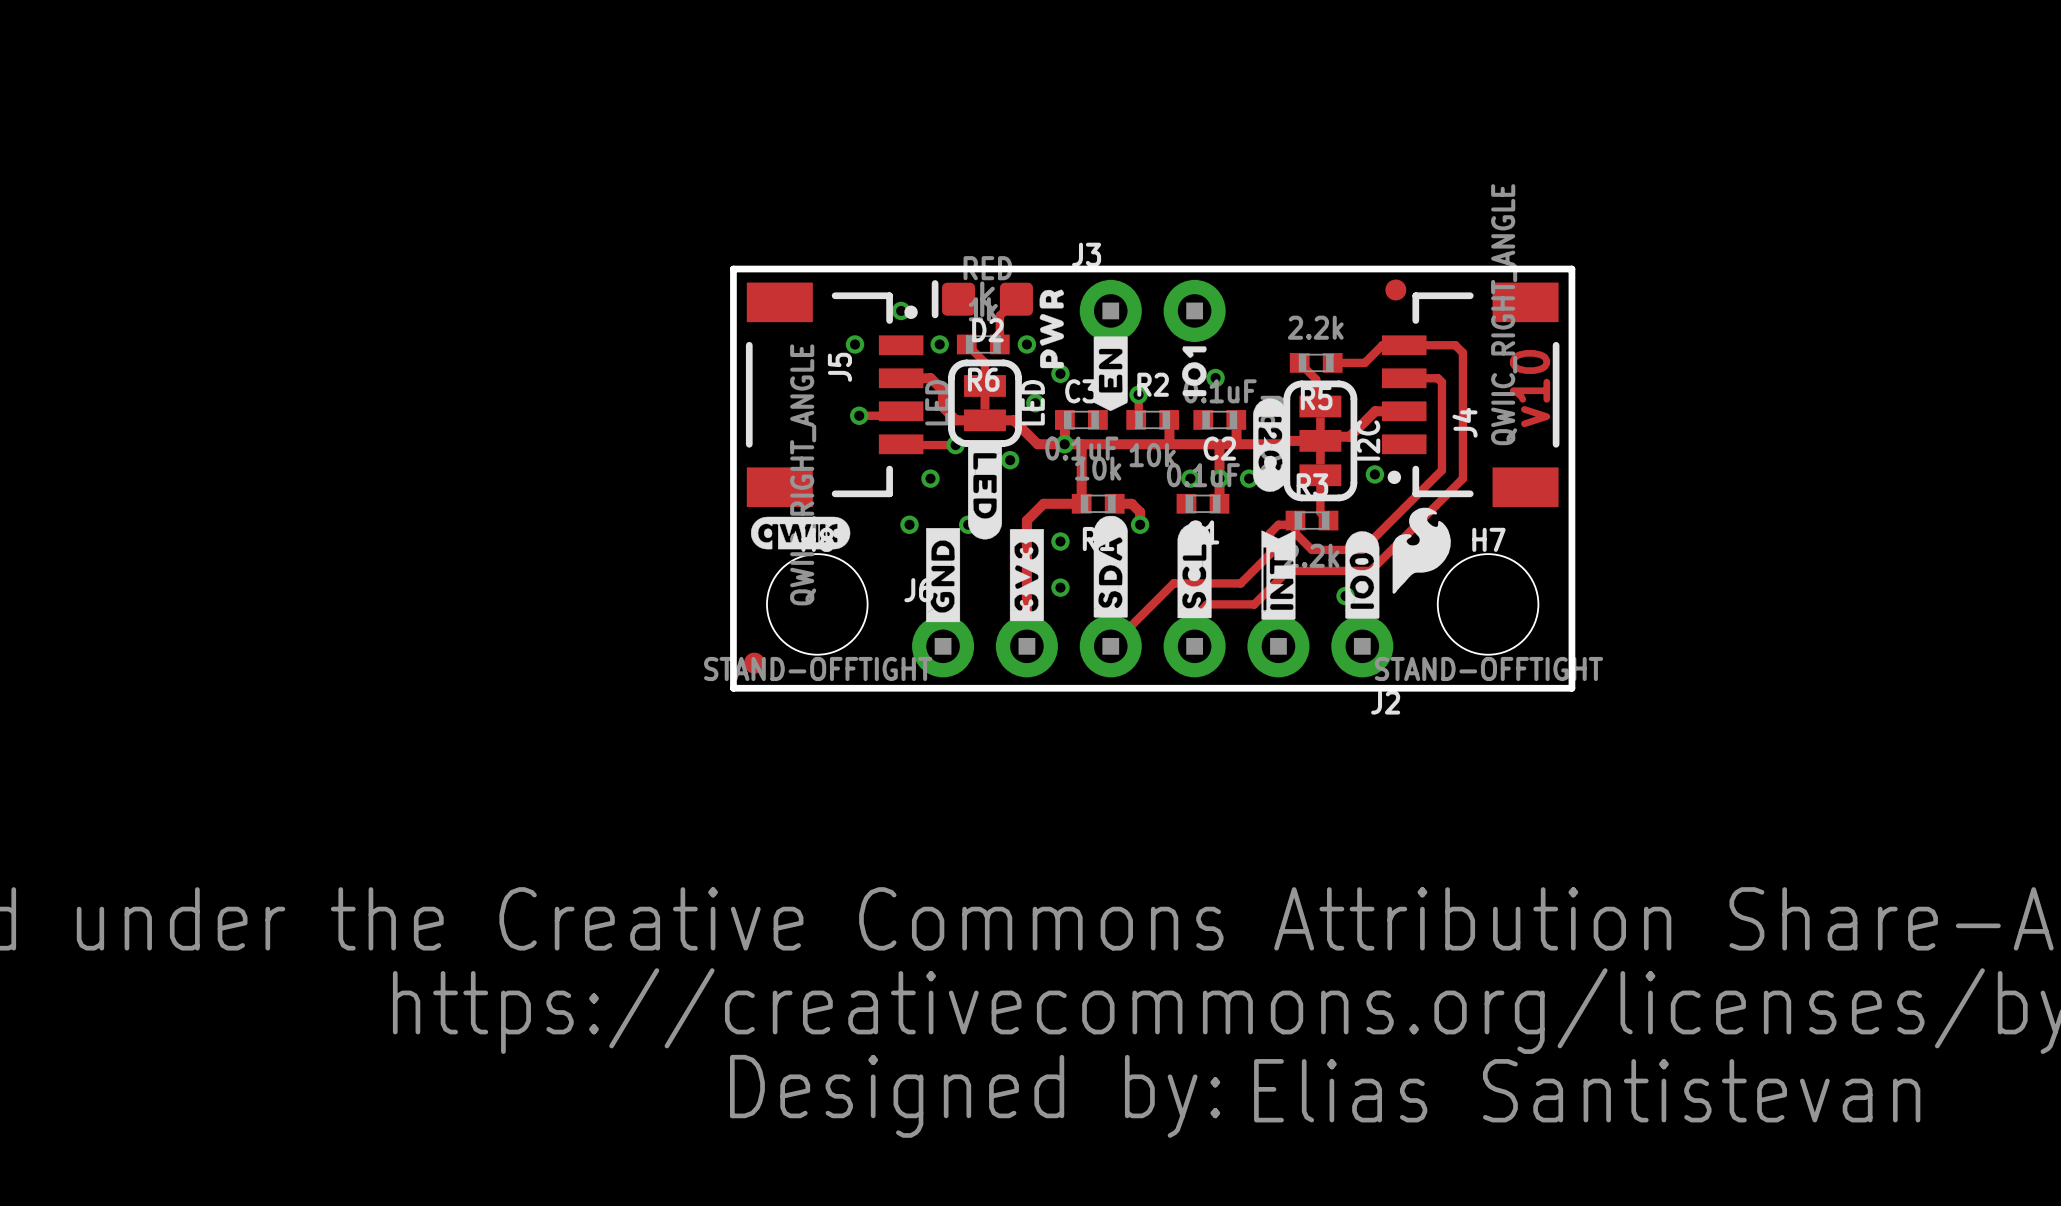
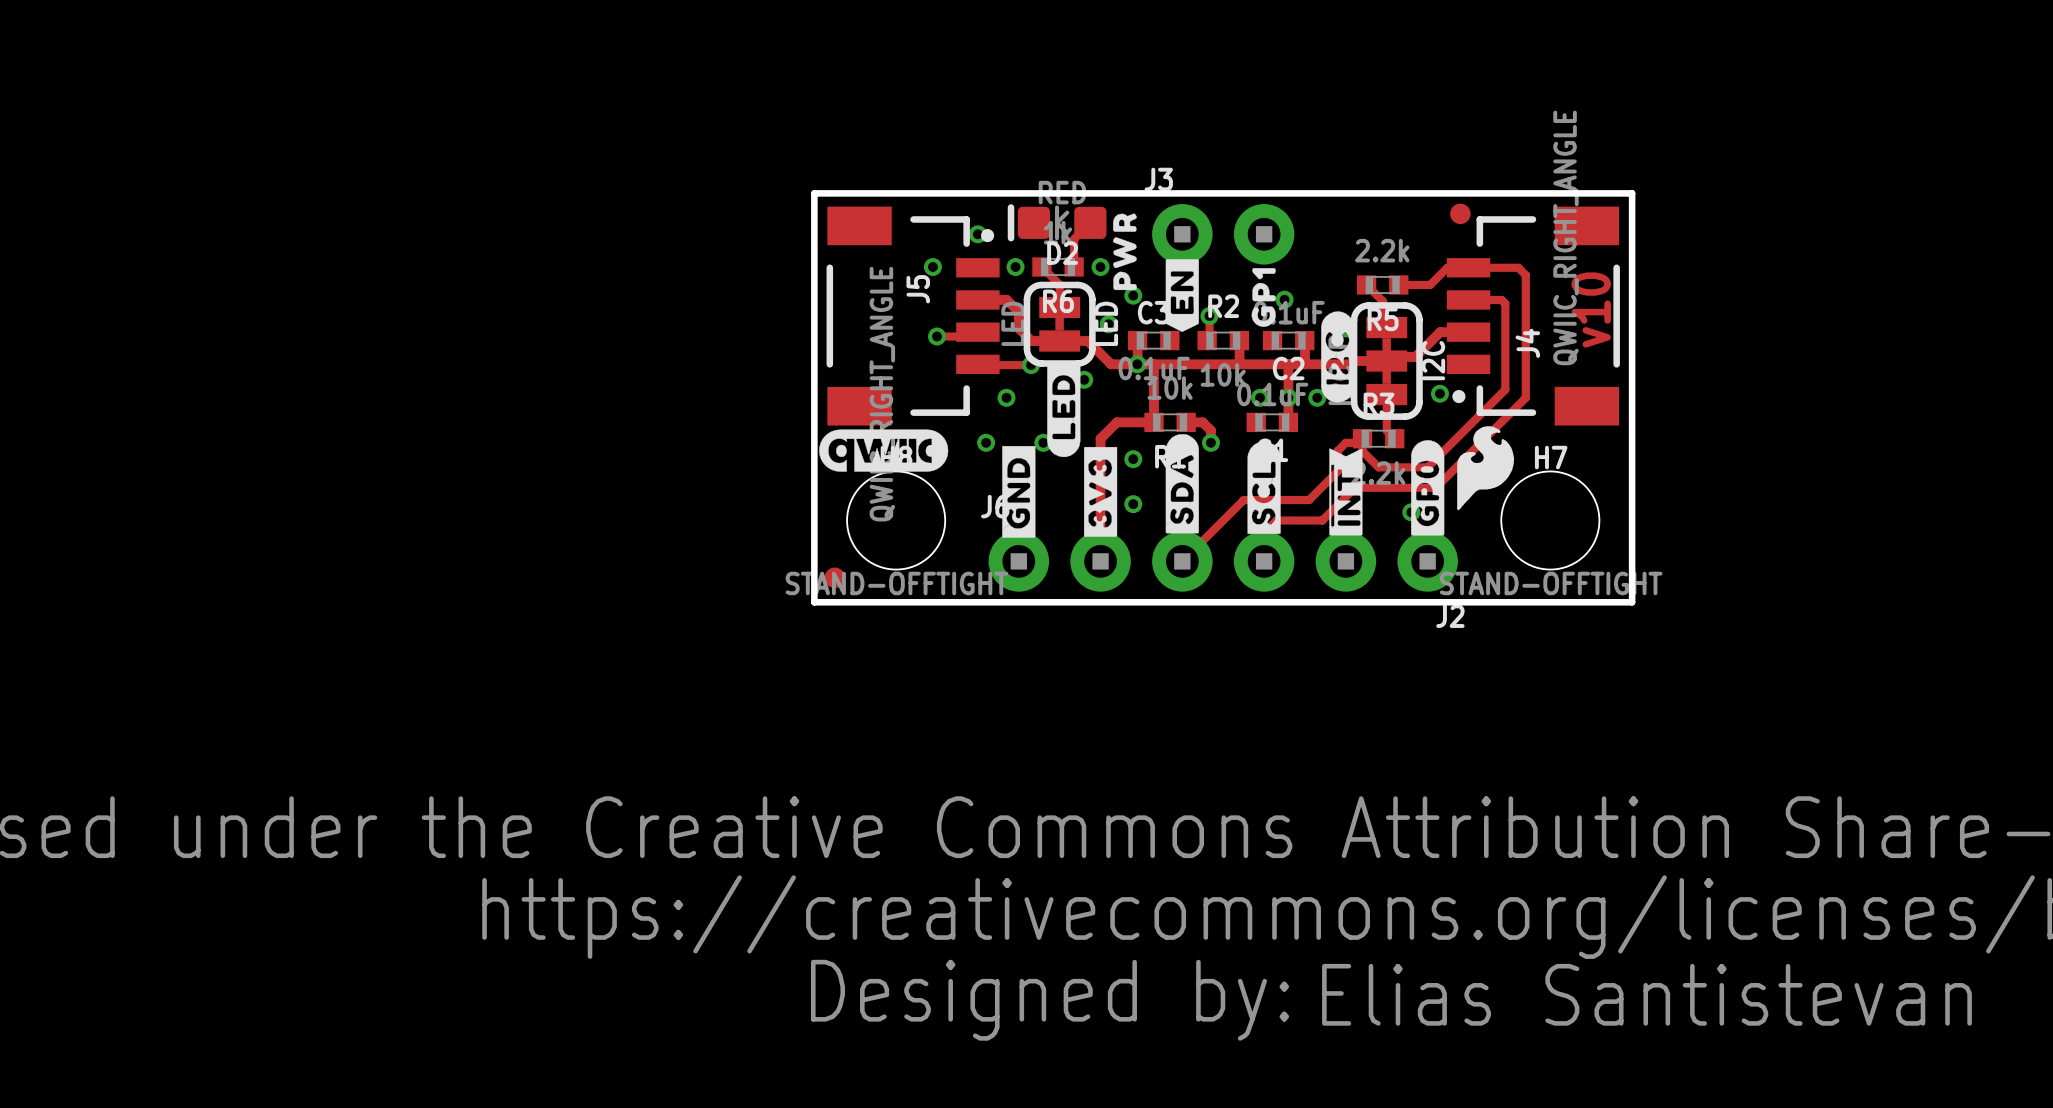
drawing shape: [1181, 346, 1207, 397] -> [1251, 268, 1276, 328]
drawing shape: [1253, 398, 1288, 492] -> [1321, 311, 1355, 403]
drawing shape: [967, 442, 1002, 540] -> [1047, 363, 1081, 458]
drawing shape: [750, 516, 851, 550] -> [819, 429, 949, 472]
drawing shape: [1345, 531, 1380, 619] -> [1411, 440, 1445, 536]

